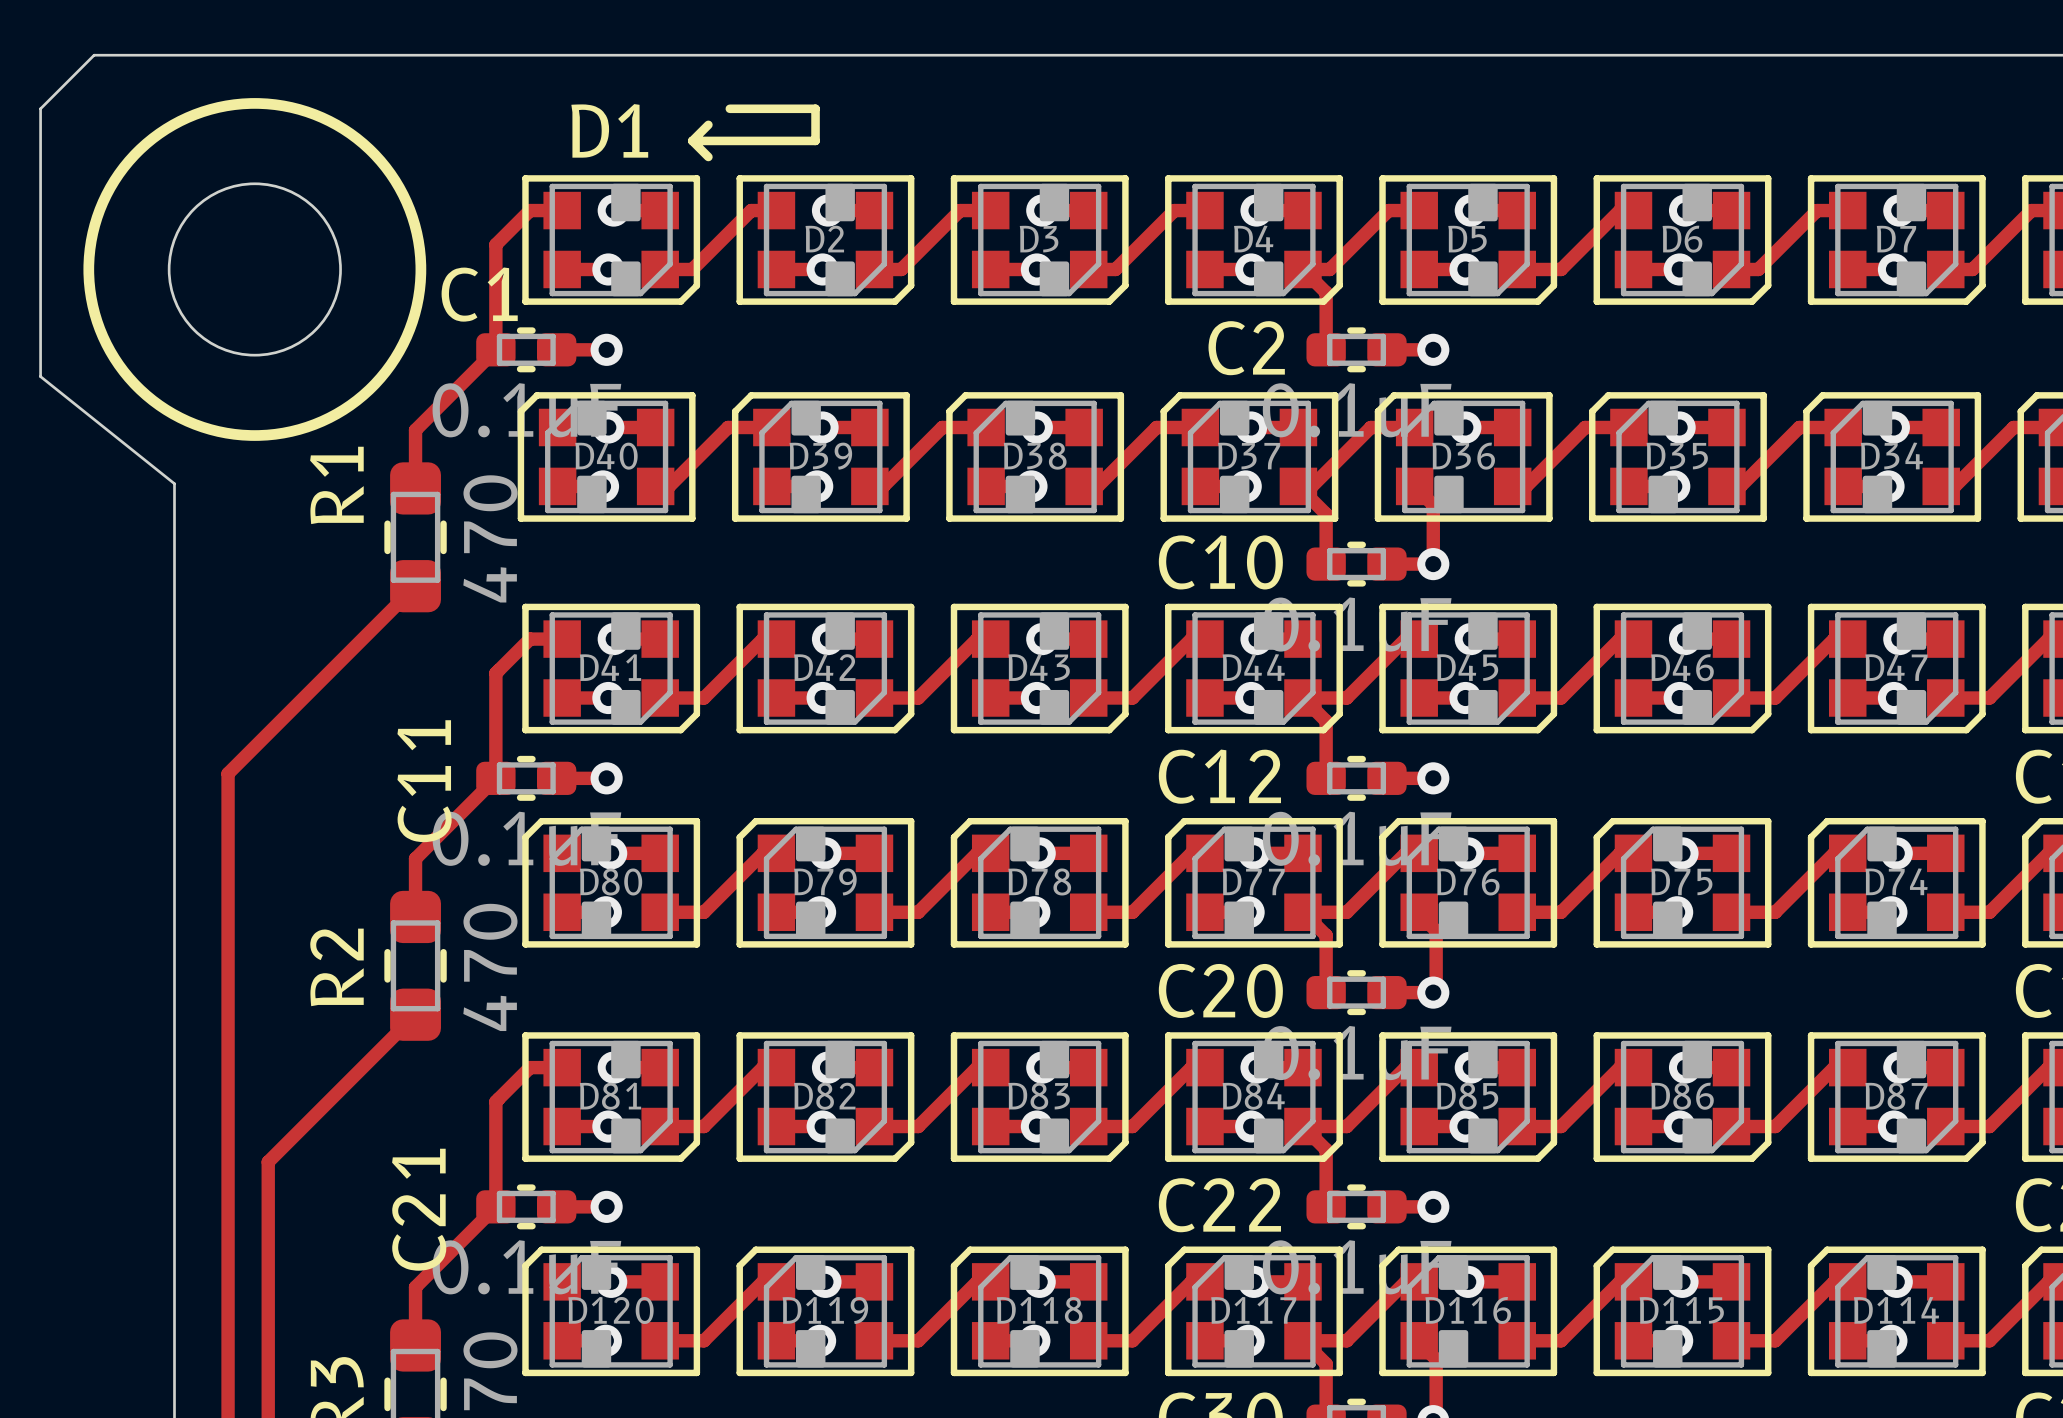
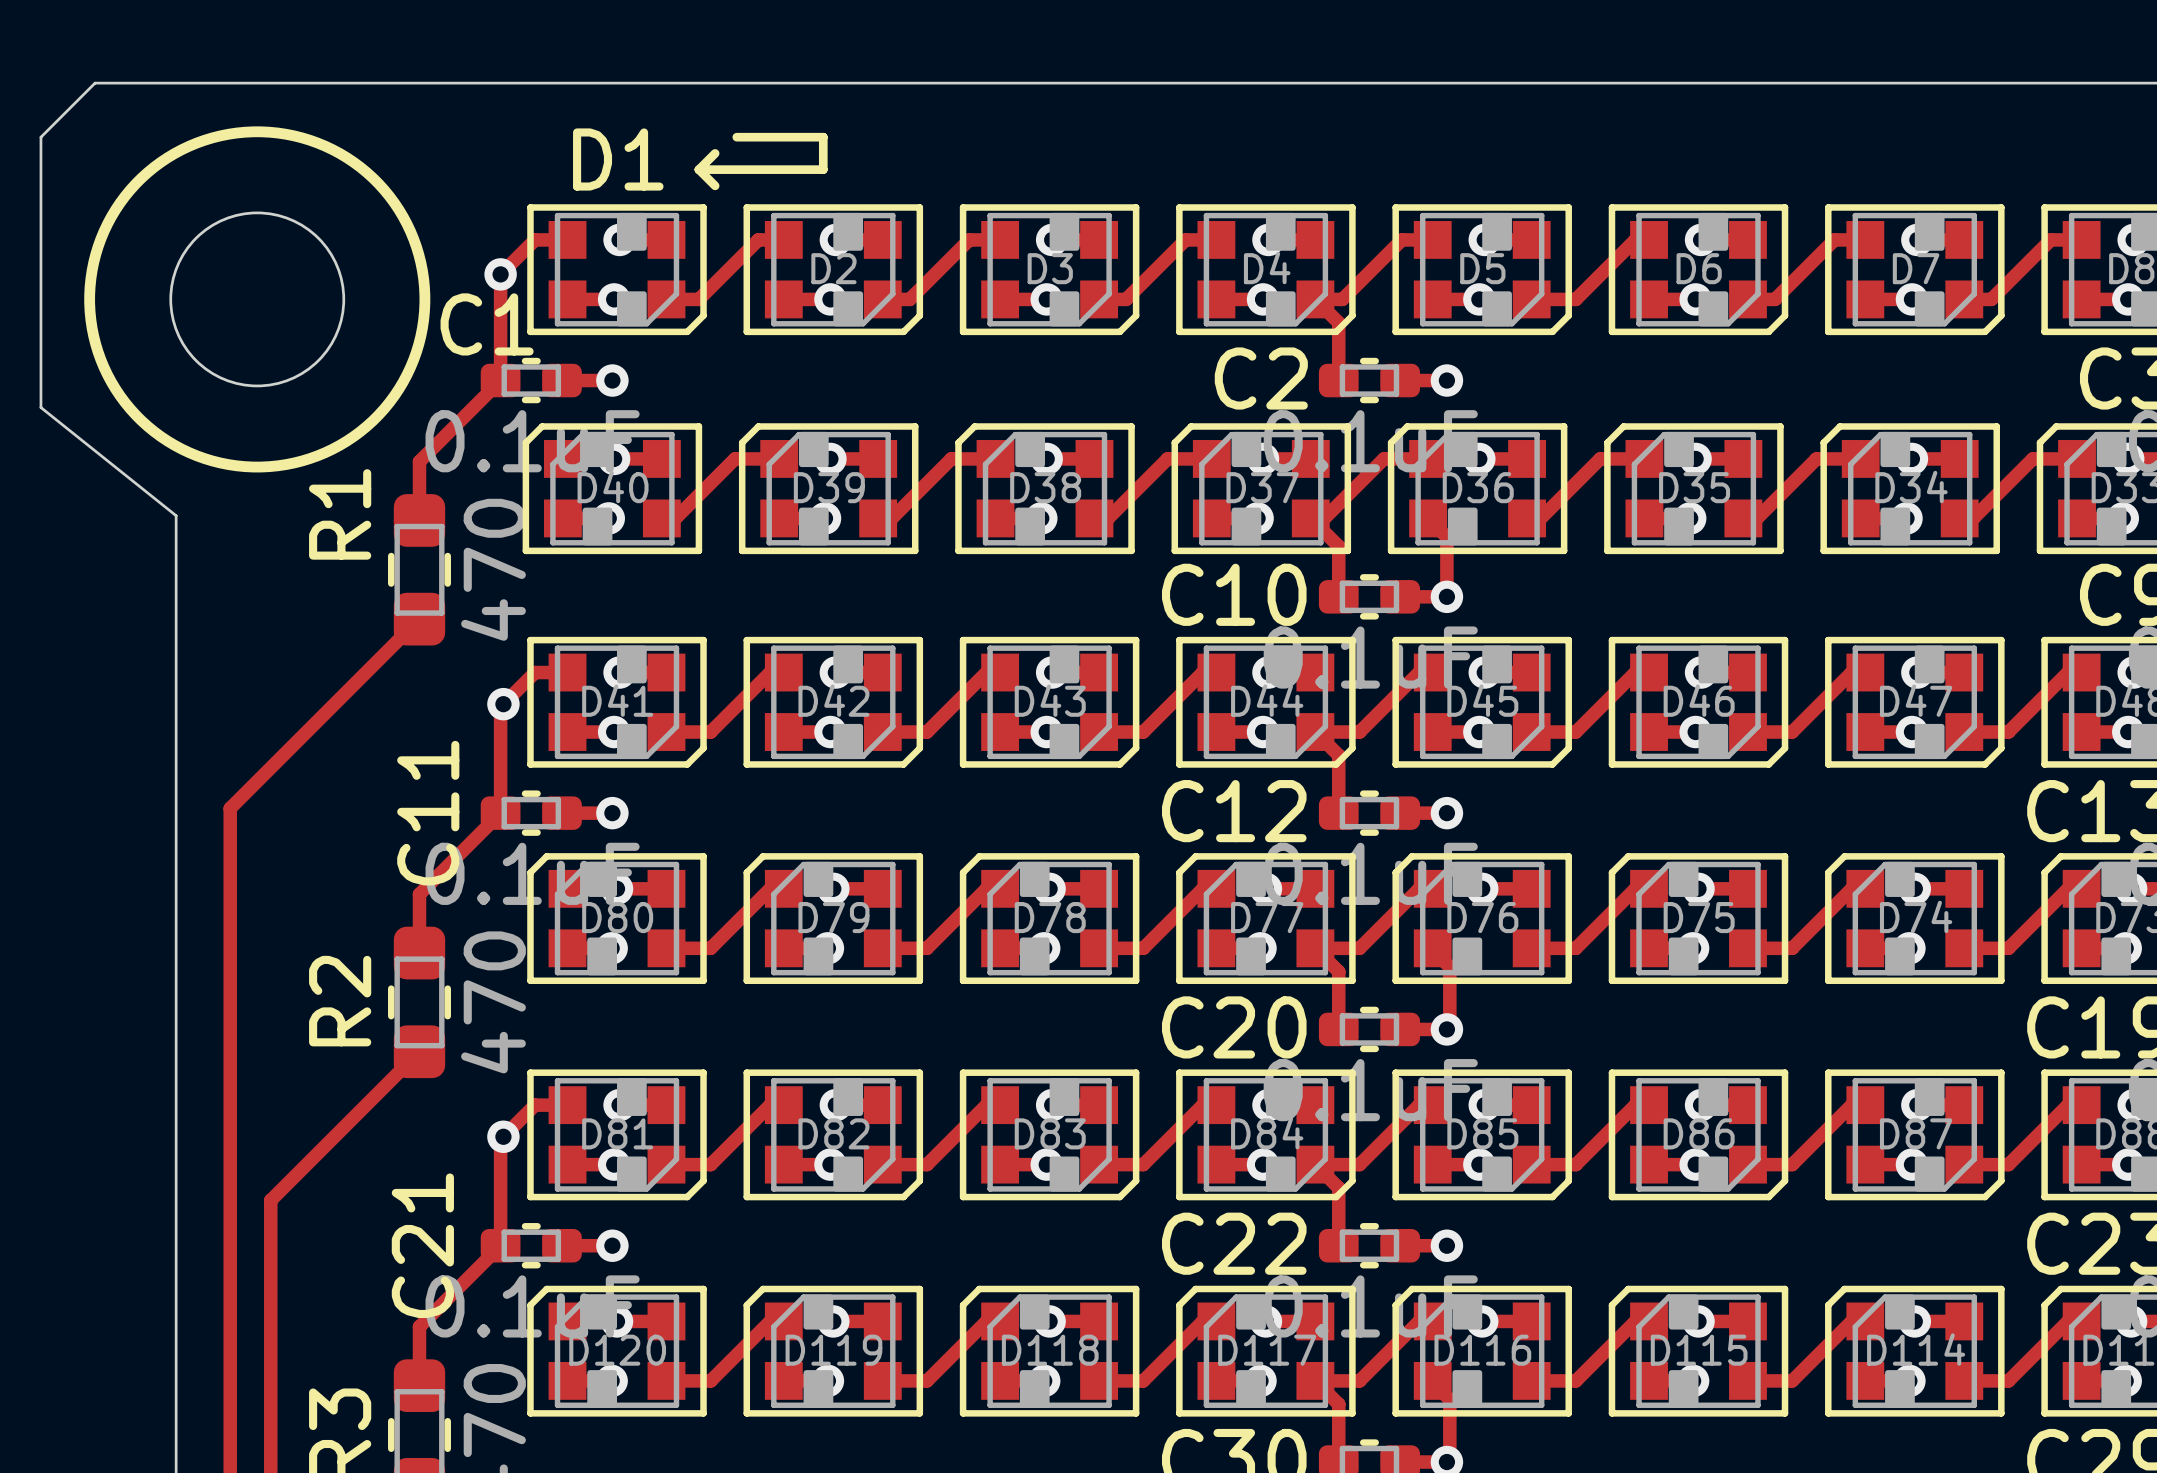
via: none -> (500, 274)
via: none -> (503, 704)
via: none -> (503, 1136)

